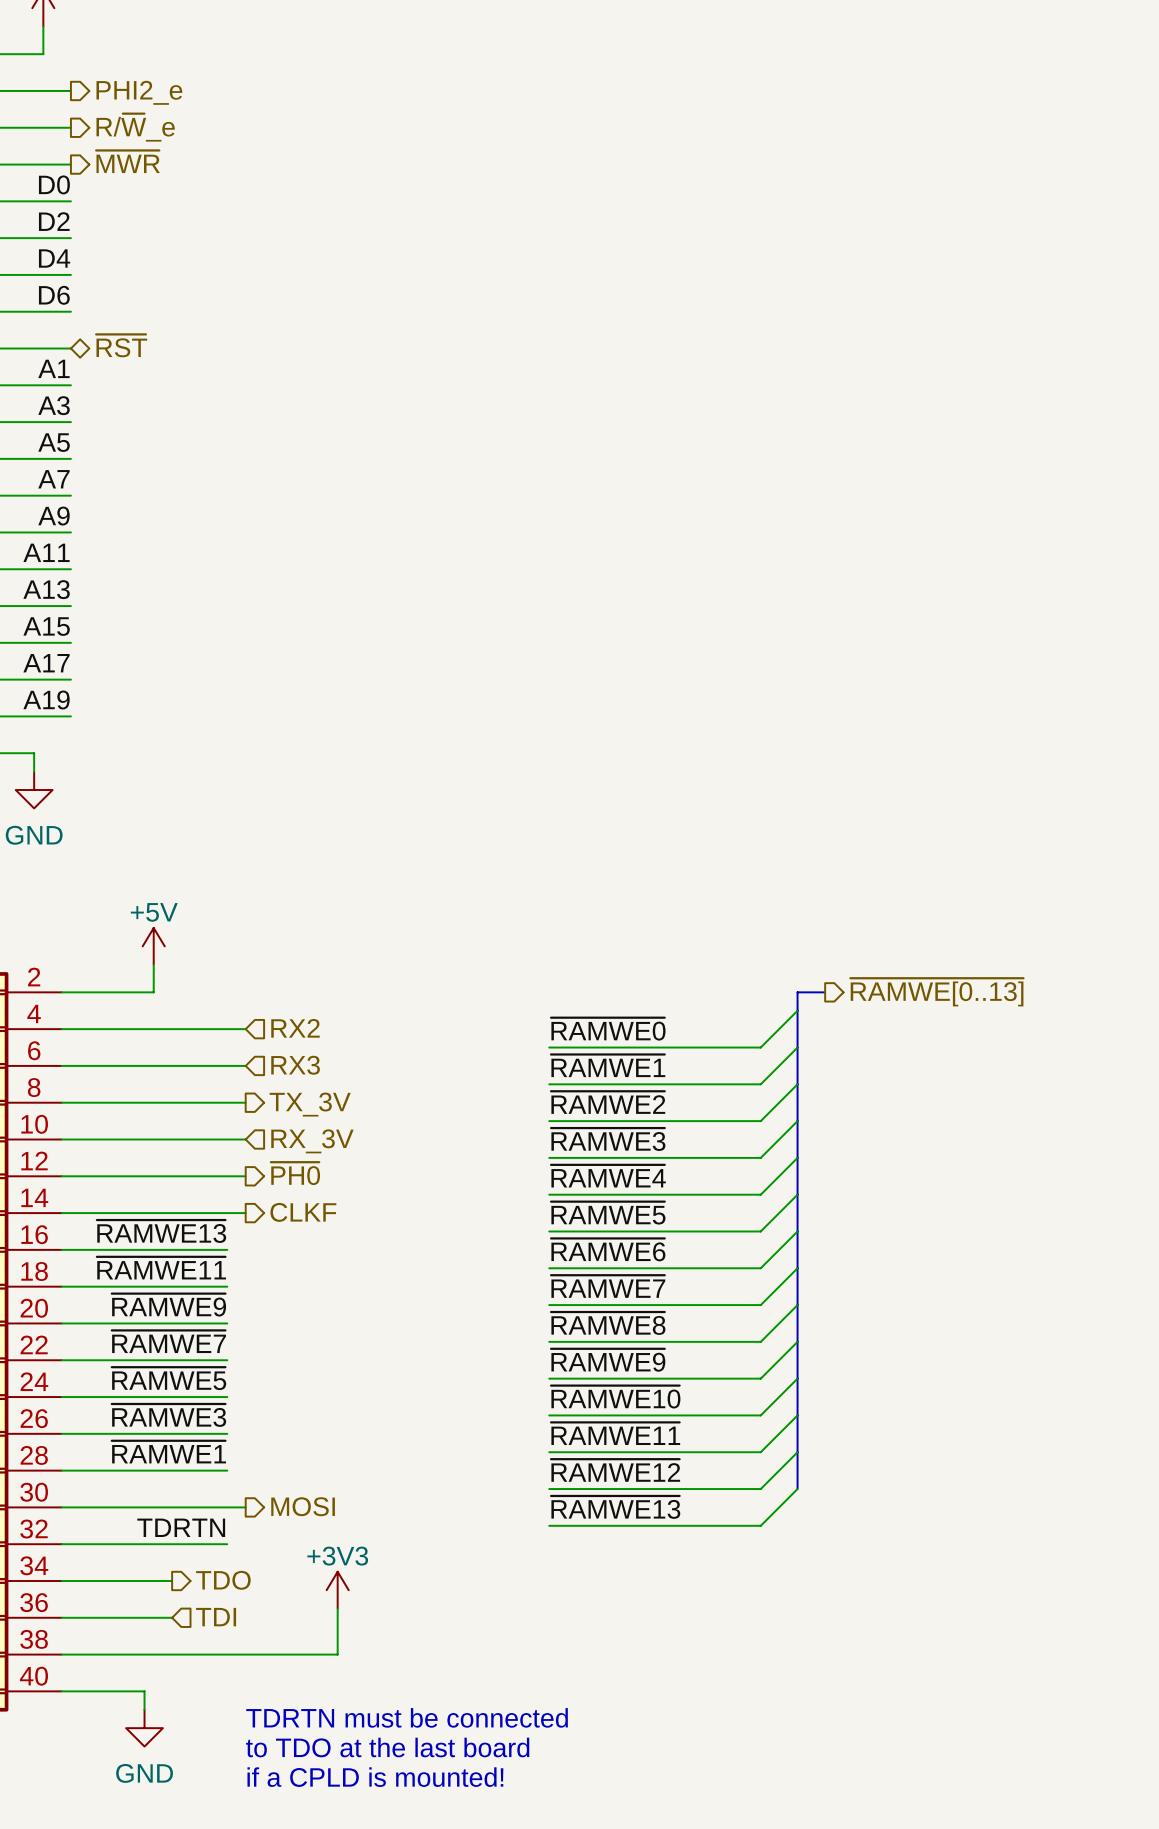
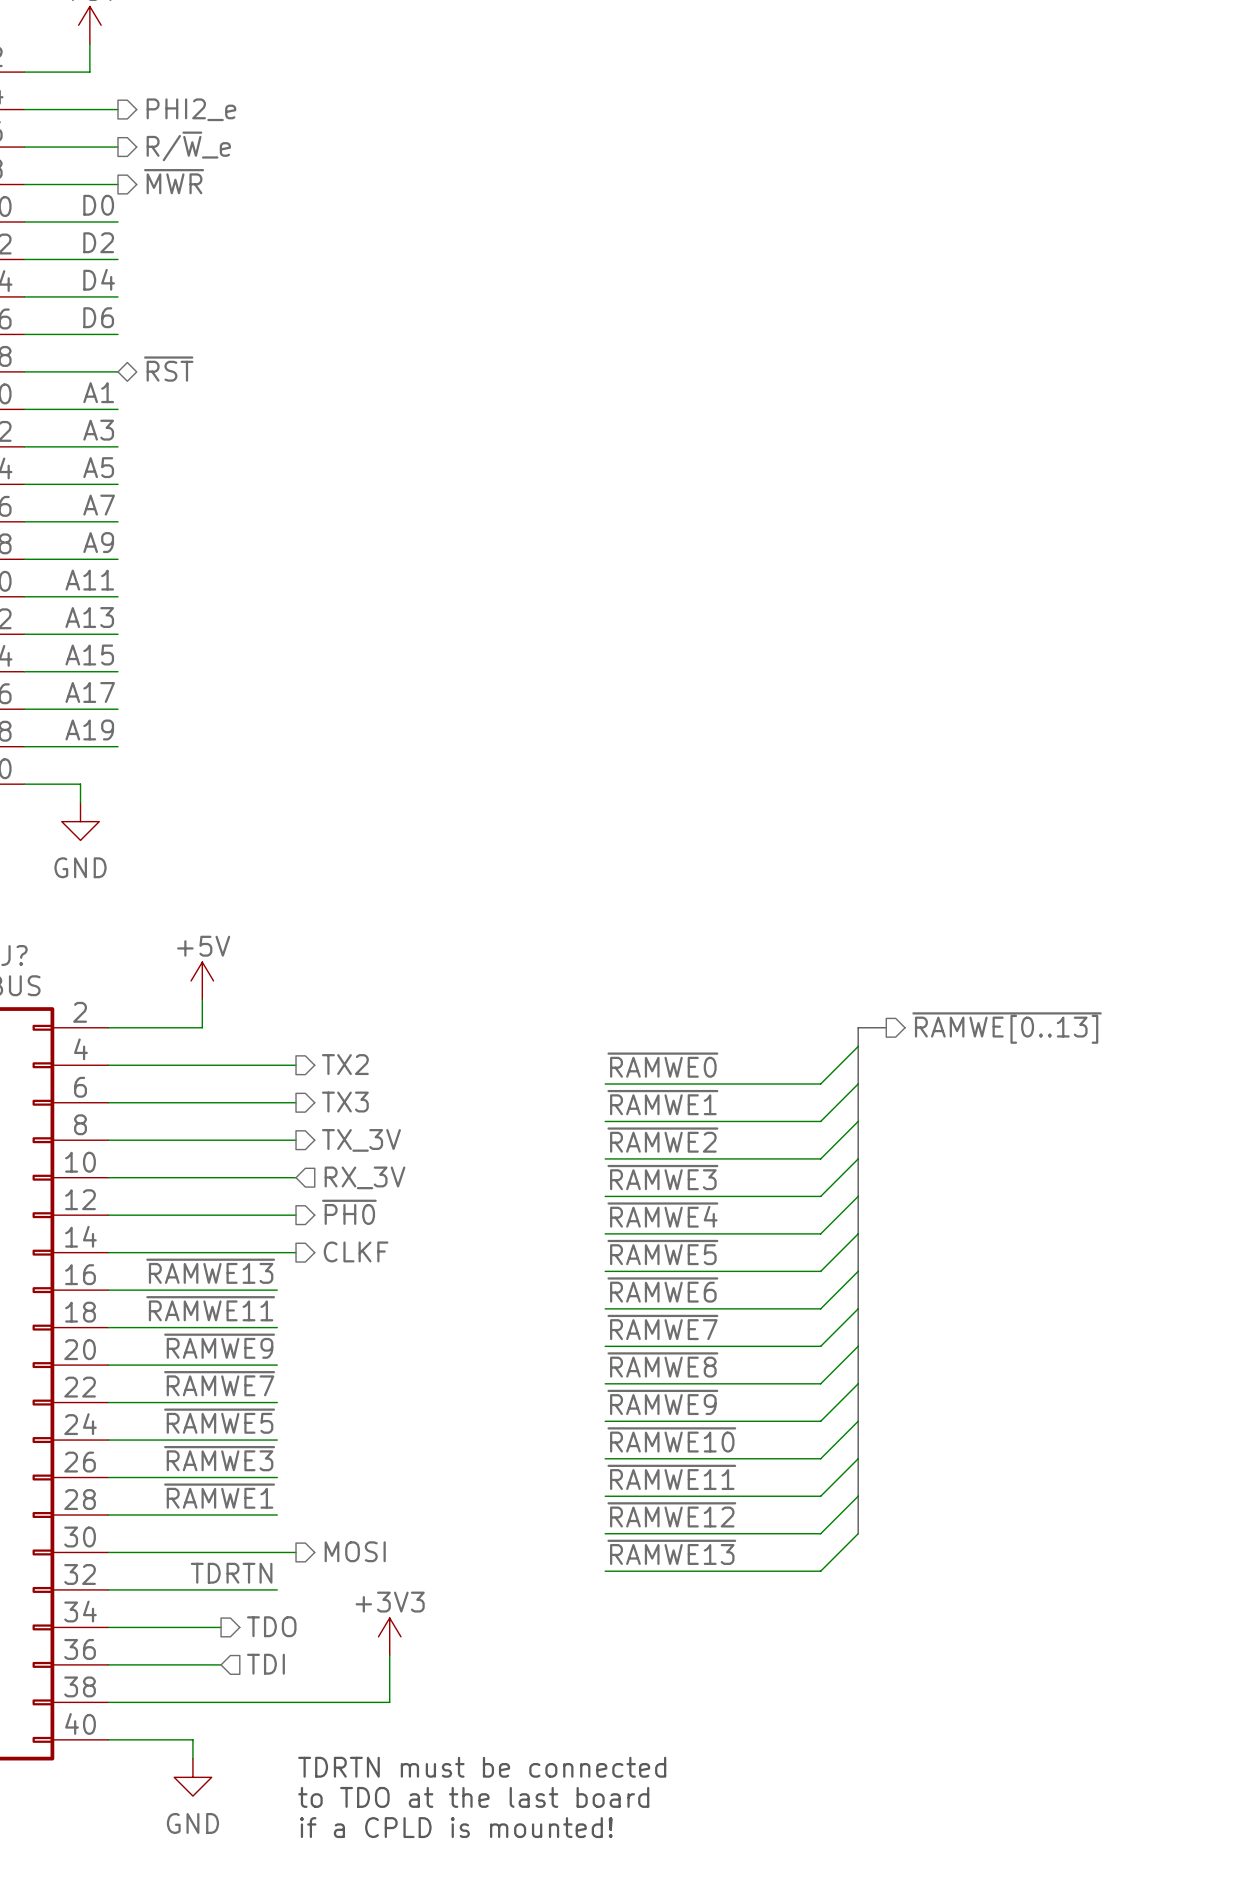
hierarchical label shape: input (295, 1028) -> output (345, 1064)
hierarchical label: RX2 (295, 1028) -> TX2 (345, 1064)
hierarchical label shape: input (295, 1065) -> output (345, 1102)
hierarchical label: RX3 (295, 1065) -> TX3 (345, 1102)

